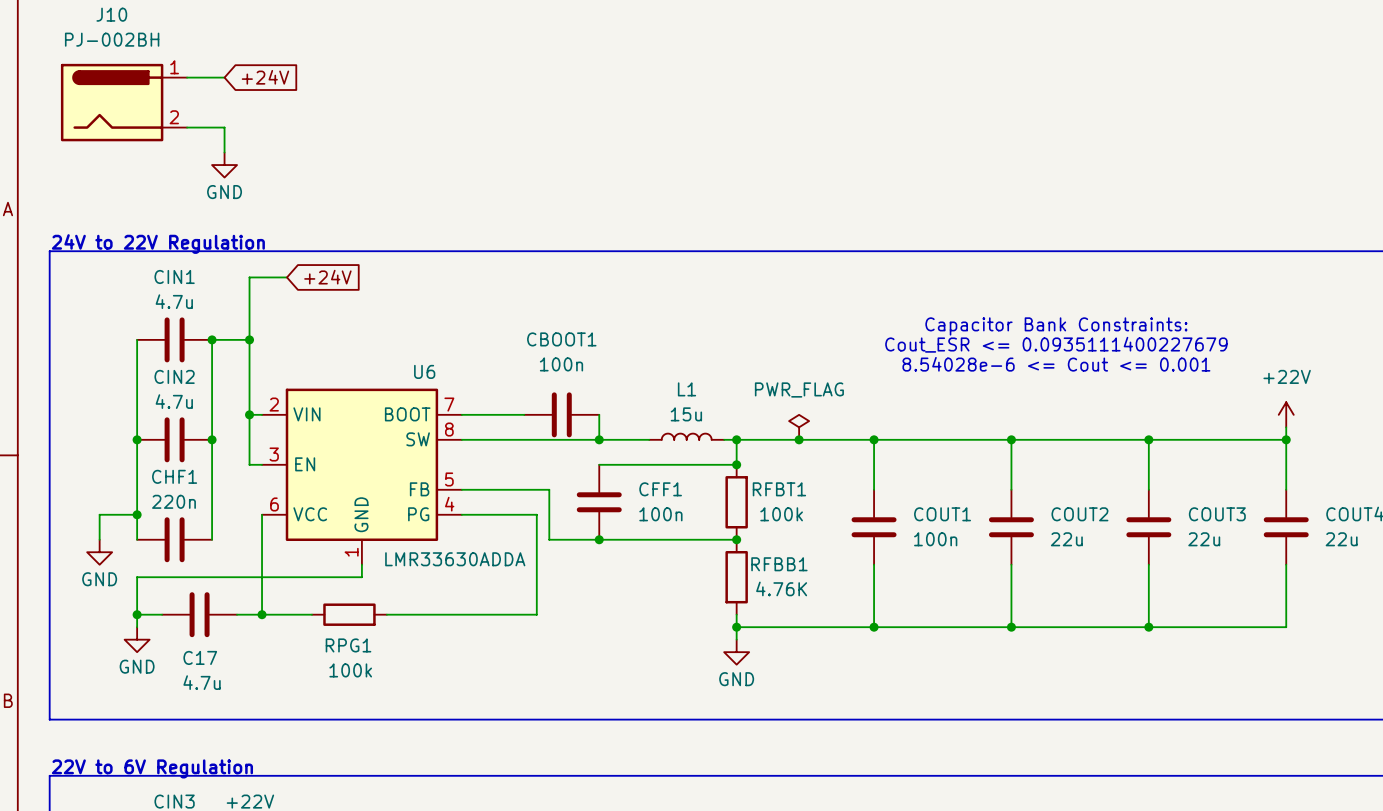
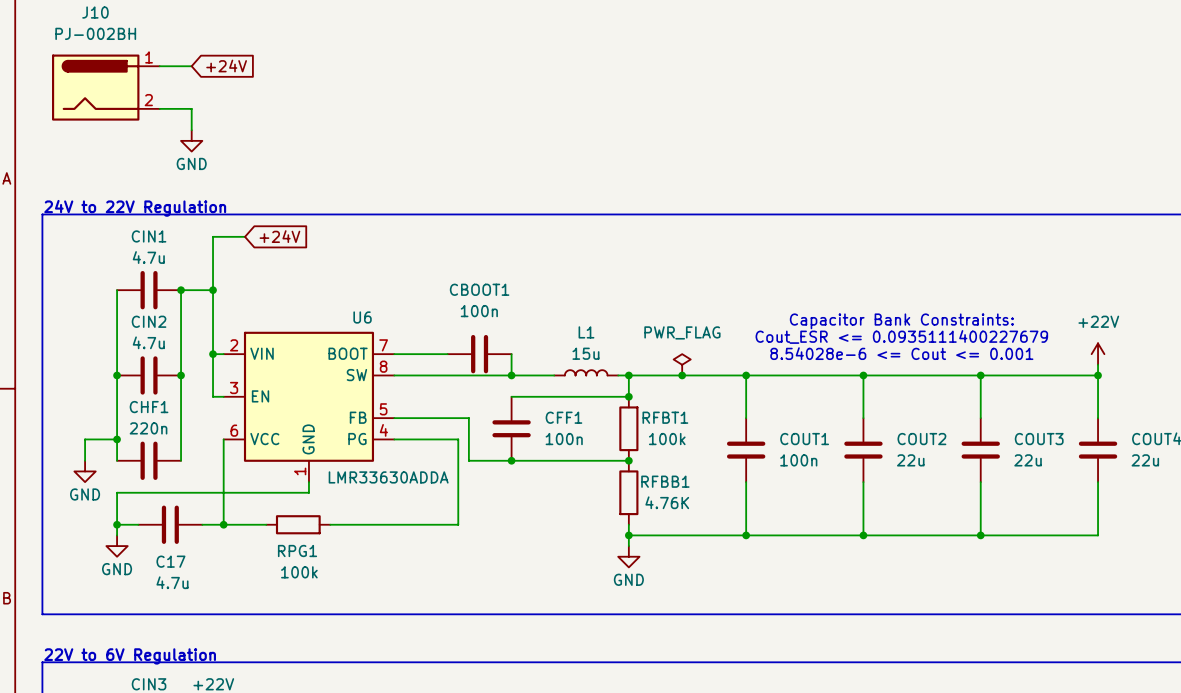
text: Capacitor Bank Constraints: (1056, 326) -> none
text position: Cout_ESR <= 0.0935111400227679 (1056, 344) -> Cout_ESR <= 0.0935111400227679 (901, 336)
text: 8.54028e-6 <= Cout <= 0.001 (1056, 364) -> Capacitor Bank Constraints: (901, 321)
text: none -> 8.54028e-6 <= Cout <= 0.001 (901, 353)

